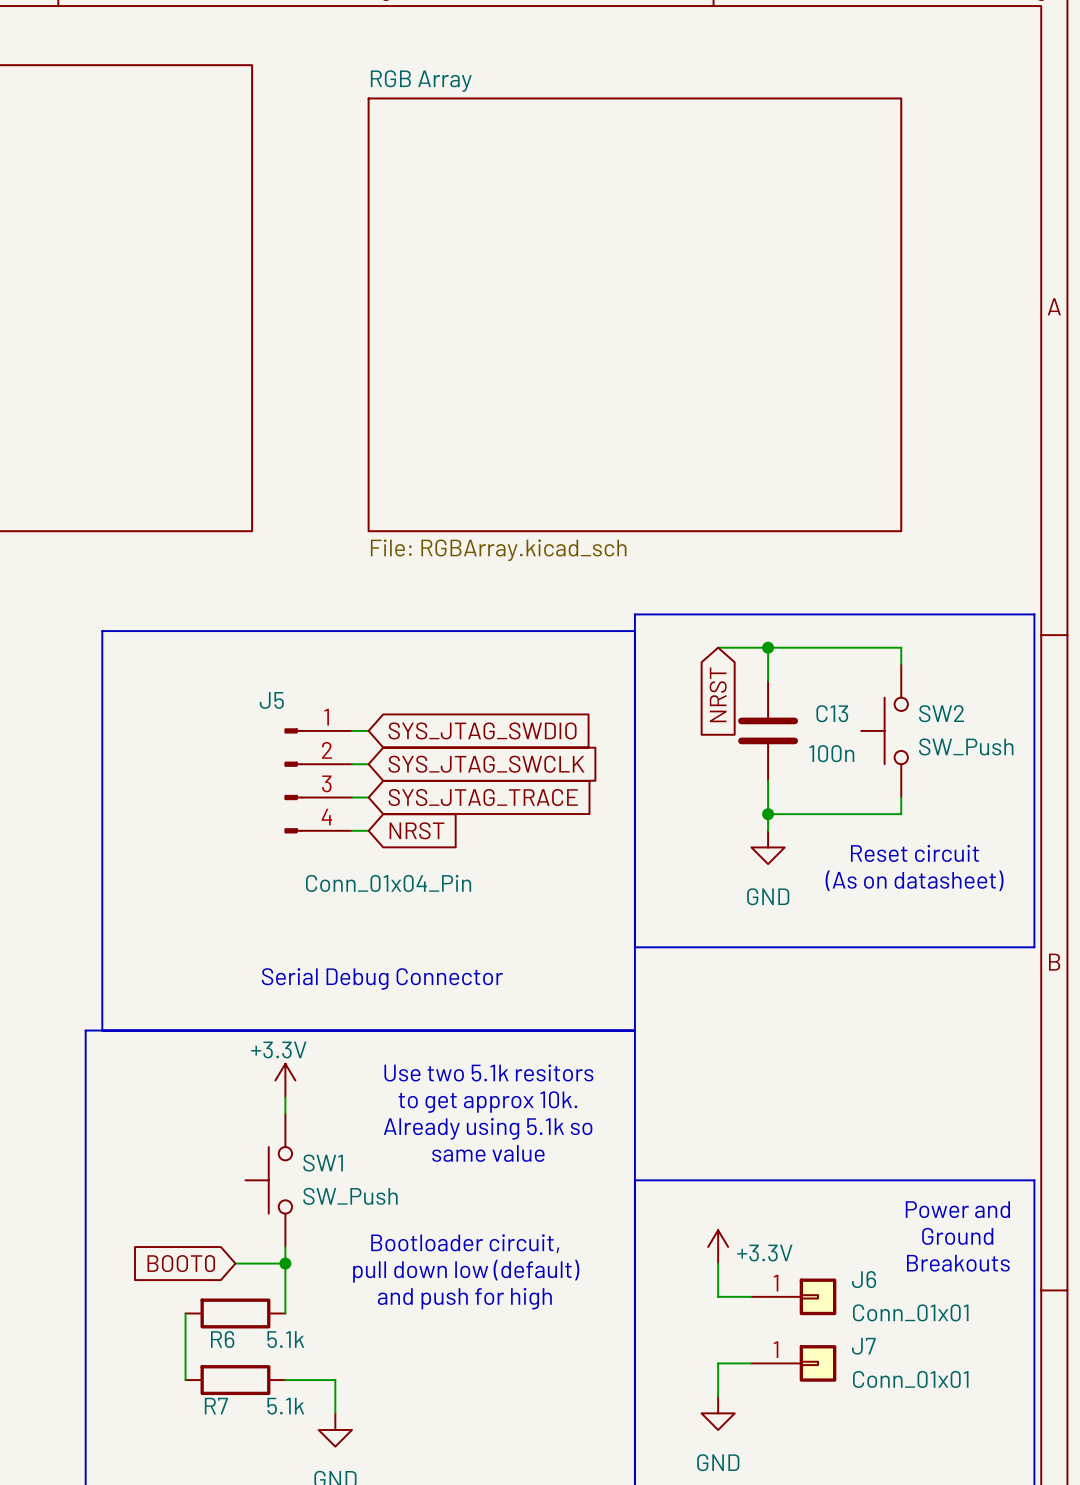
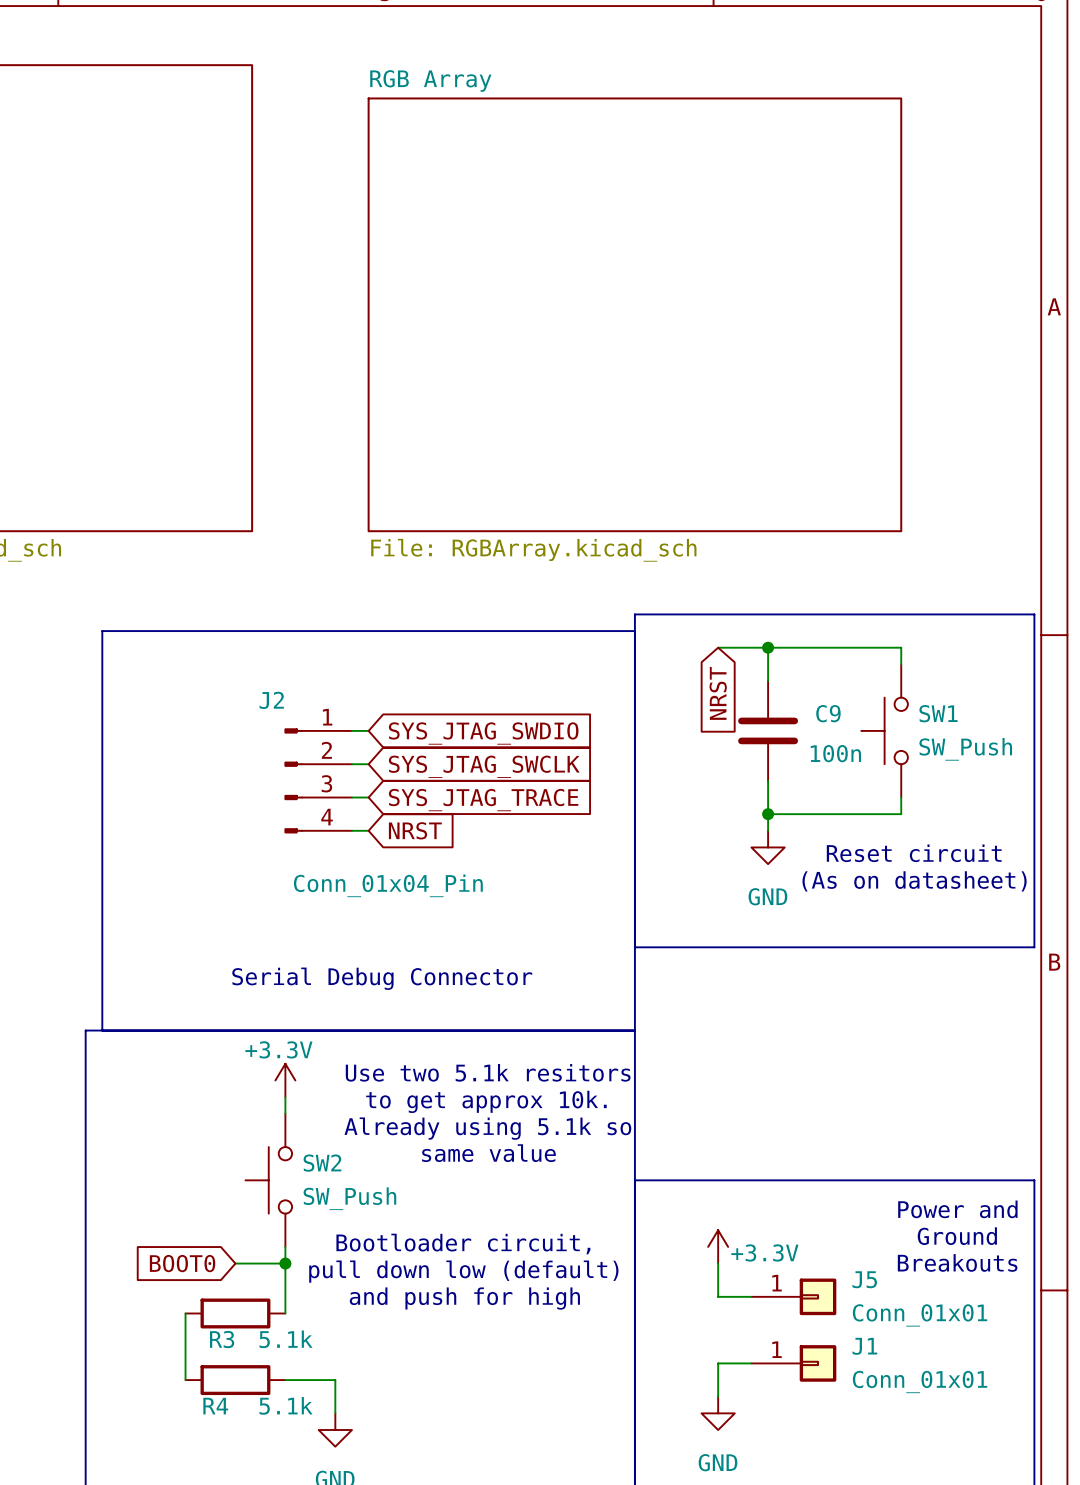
J5 name: J5 (271, 700) -> J2 (271, 700)
C13 name: C13 (832, 713) -> C9 (828, 713)
SW2 name: SW2 (941, 713) -> SW1 (938, 713)
SW1 name: SW1 (323, 1163) -> SW2 (322, 1163)
J6 name: J6 (864, 1279) -> J5 (864, 1279)
R6 name: R6 (222, 1339) -> R3 (222, 1339)
J7 name: J7 (863, 1346) -> J1 (864, 1346)
R7 name: R7 (216, 1406) -> R4 (215, 1406)

